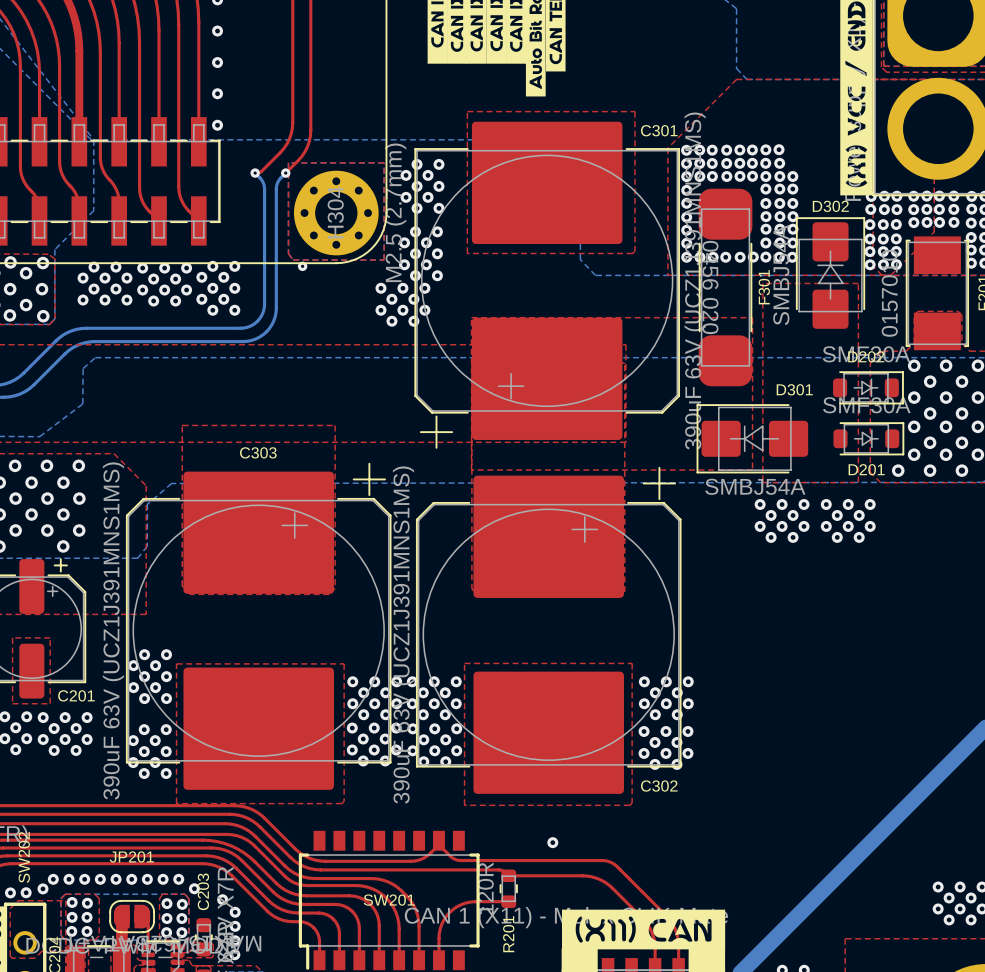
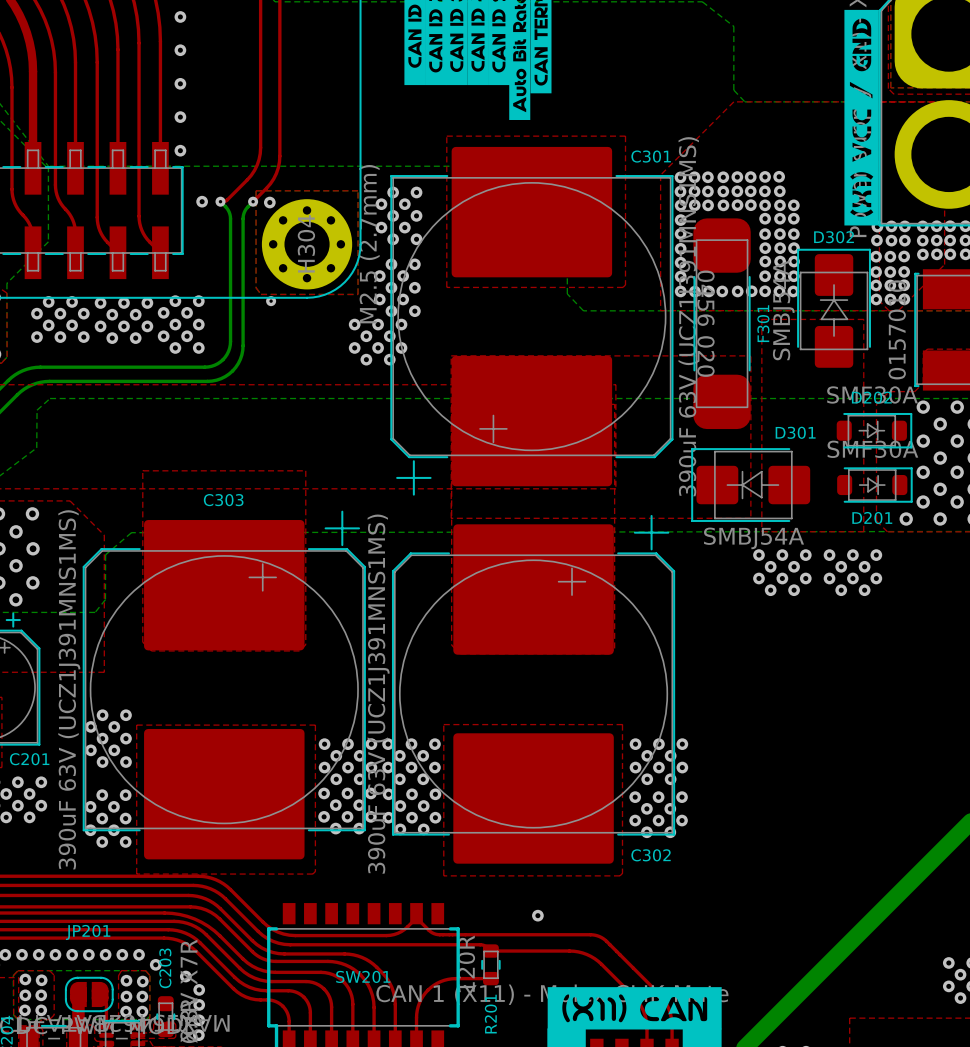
via: none -> (202, 201)
via: none -> (269, 202)

